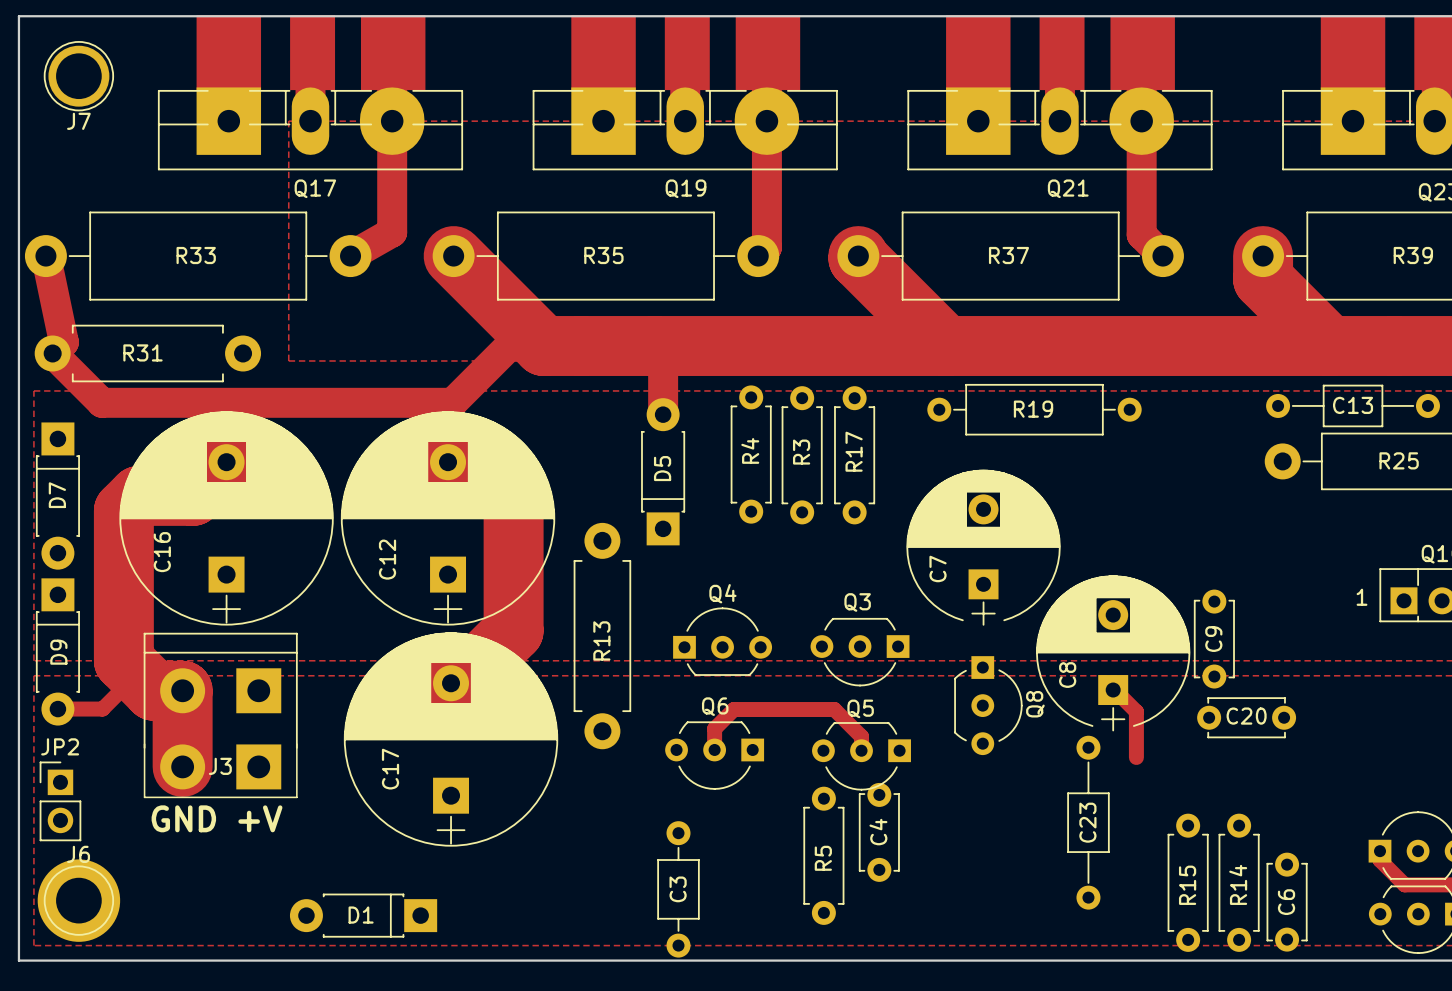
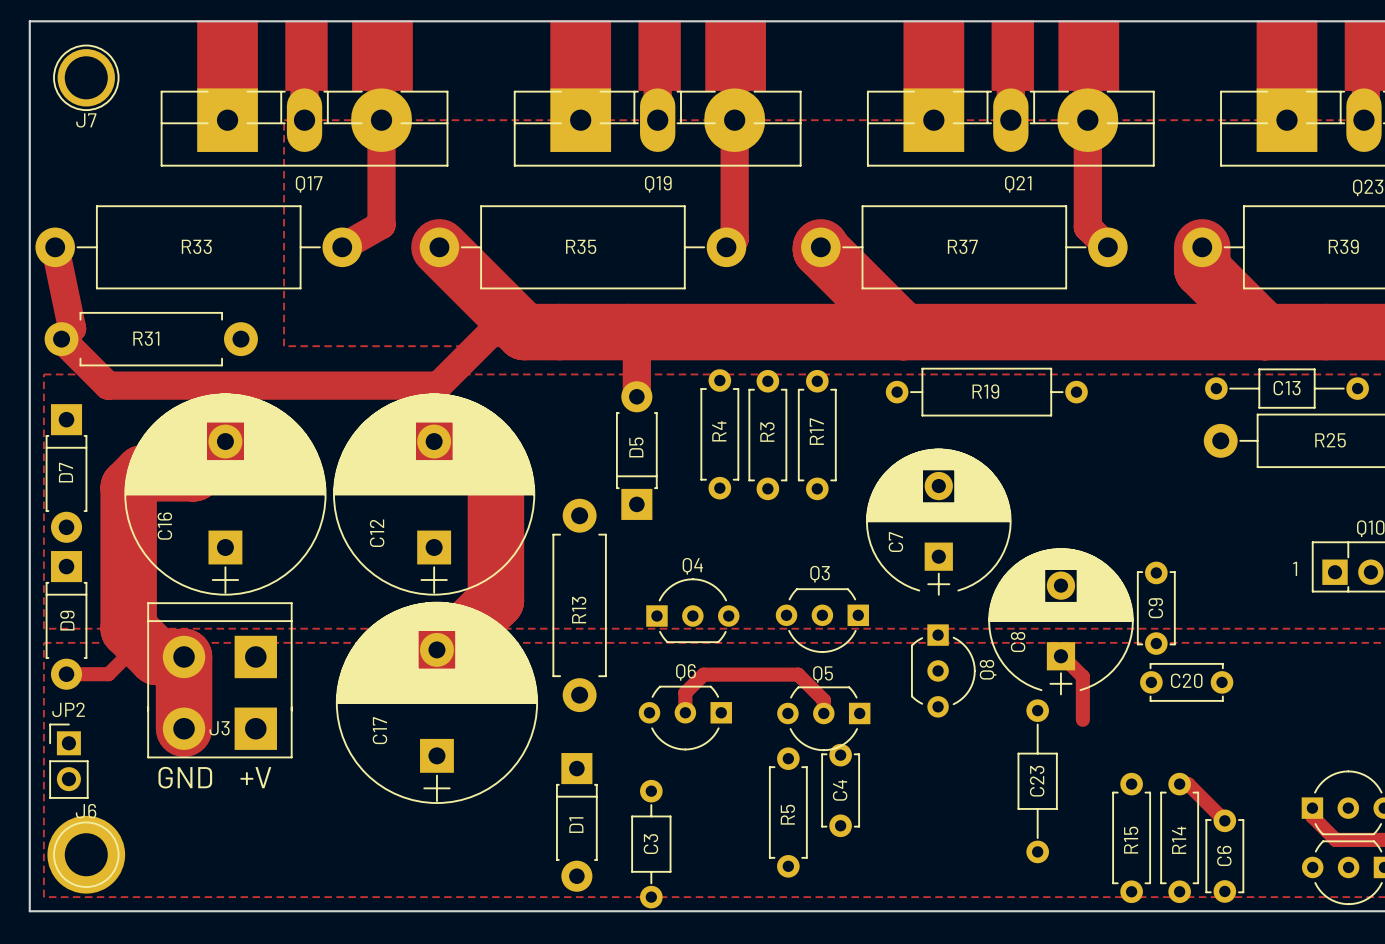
track: none -> (1179, 784) (1188, 784) (1224, 820)
D1 rotation: 0° (363, 915) -> 90° counterclockwise (576, 822)
D1 position: (363, 915) -> (576, 822)

